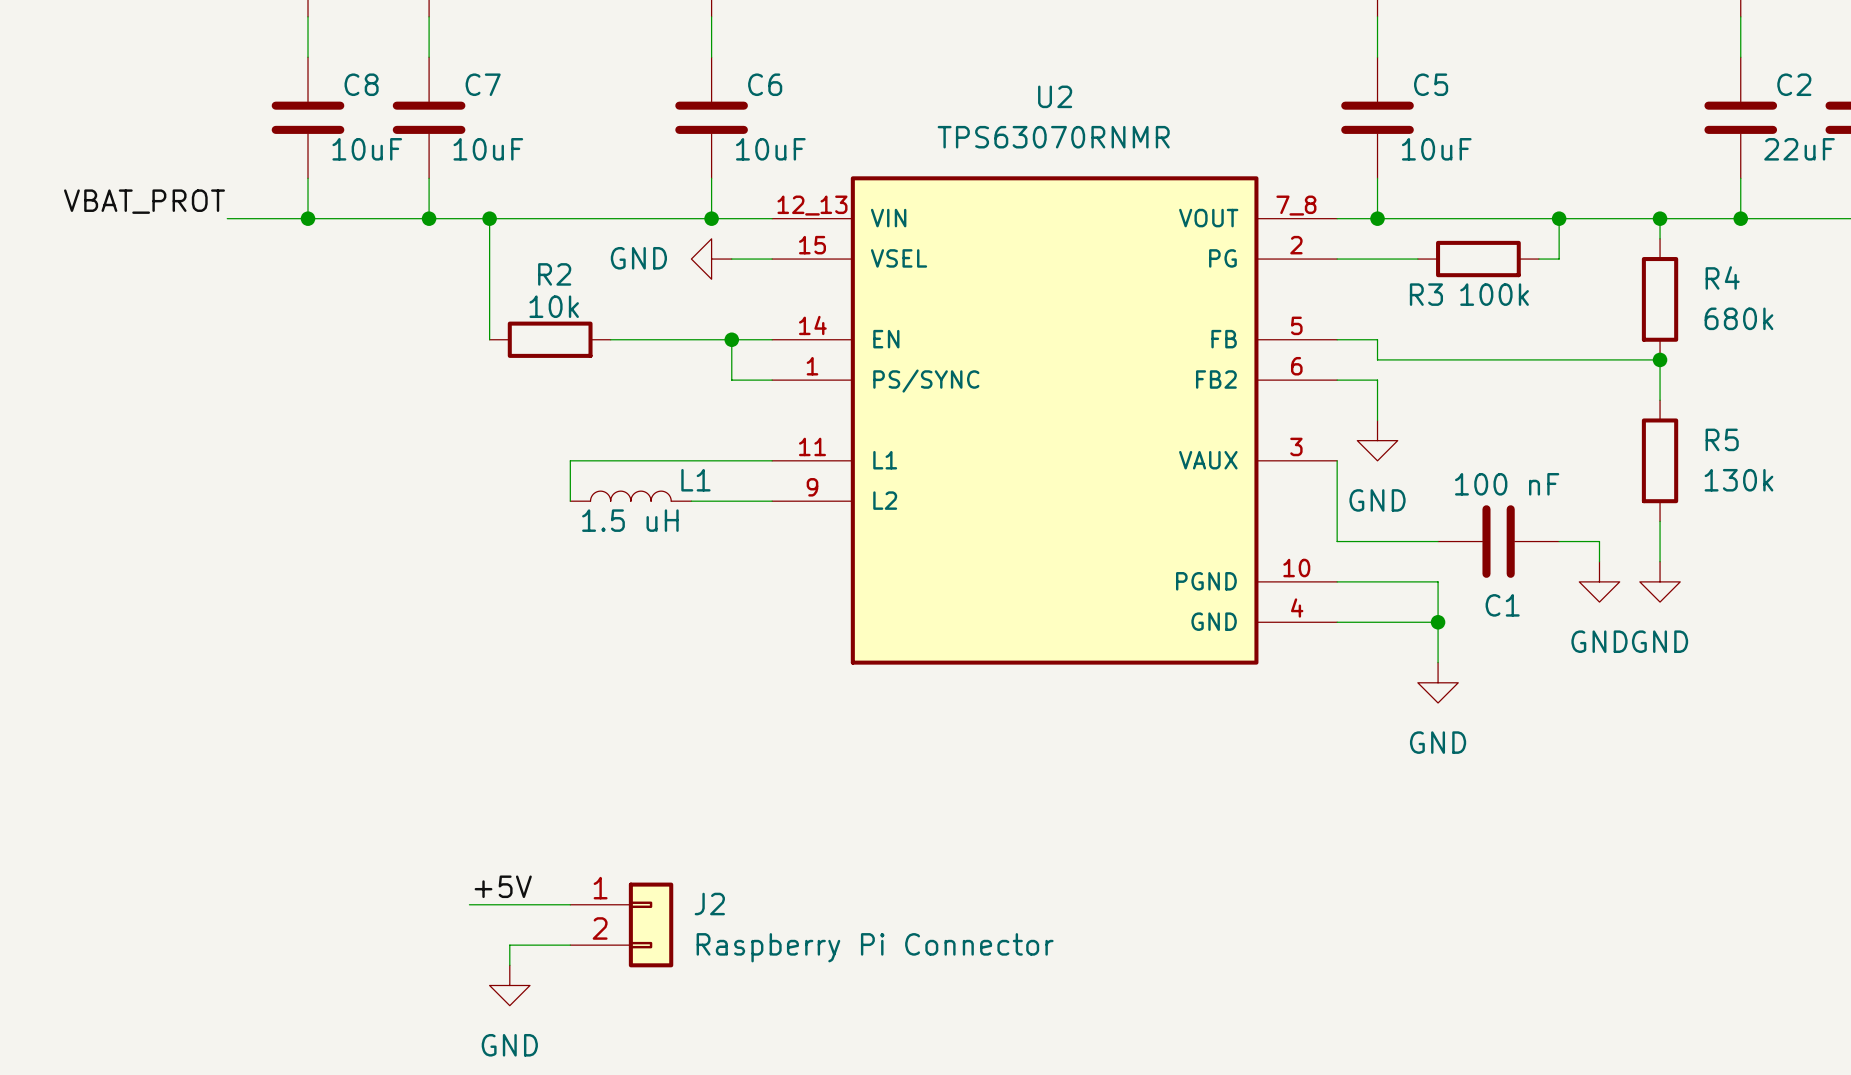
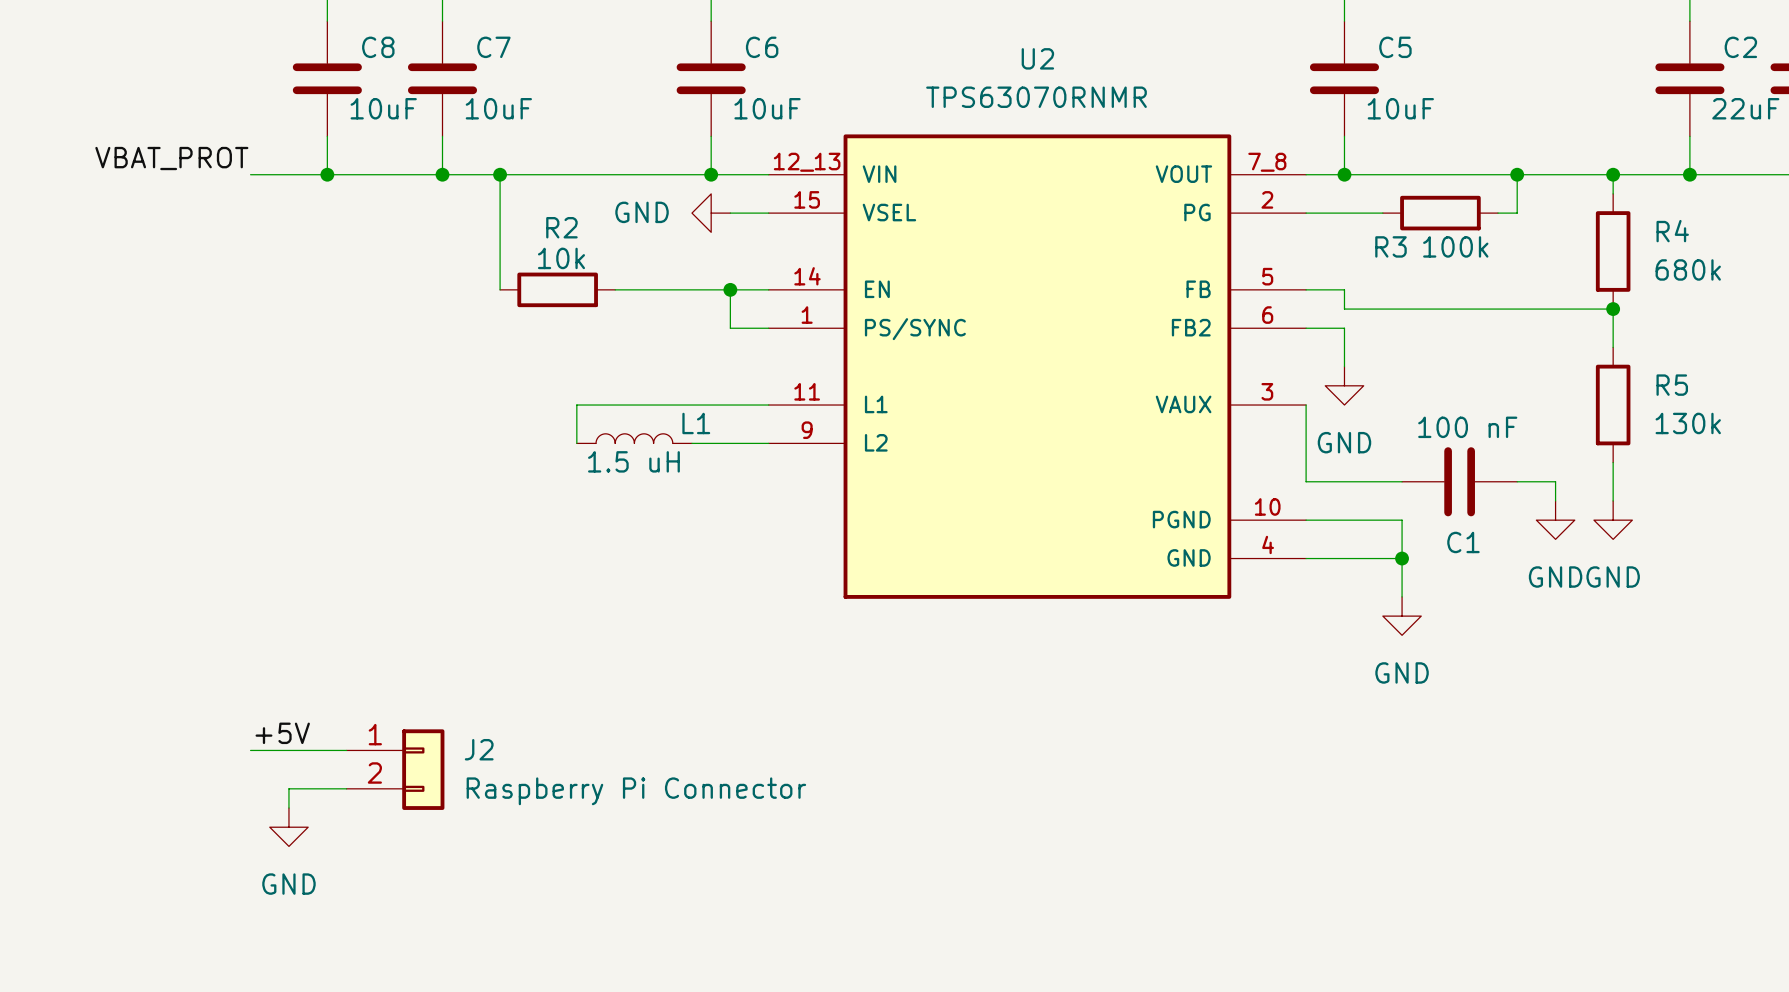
label position: +5V (503, 886) -> +5V (282, 733)
wire: (469, 904) (570, 904) -> (250, 750) (346, 750)
J2 position: (621, 924) -> (395, 769)
wire: (570, 945) (509, 945) (509, 965) -> (346, 788) (288, 788) (288, 808)
power symbol position: GND (509, 985) -> GND (288, 827)

